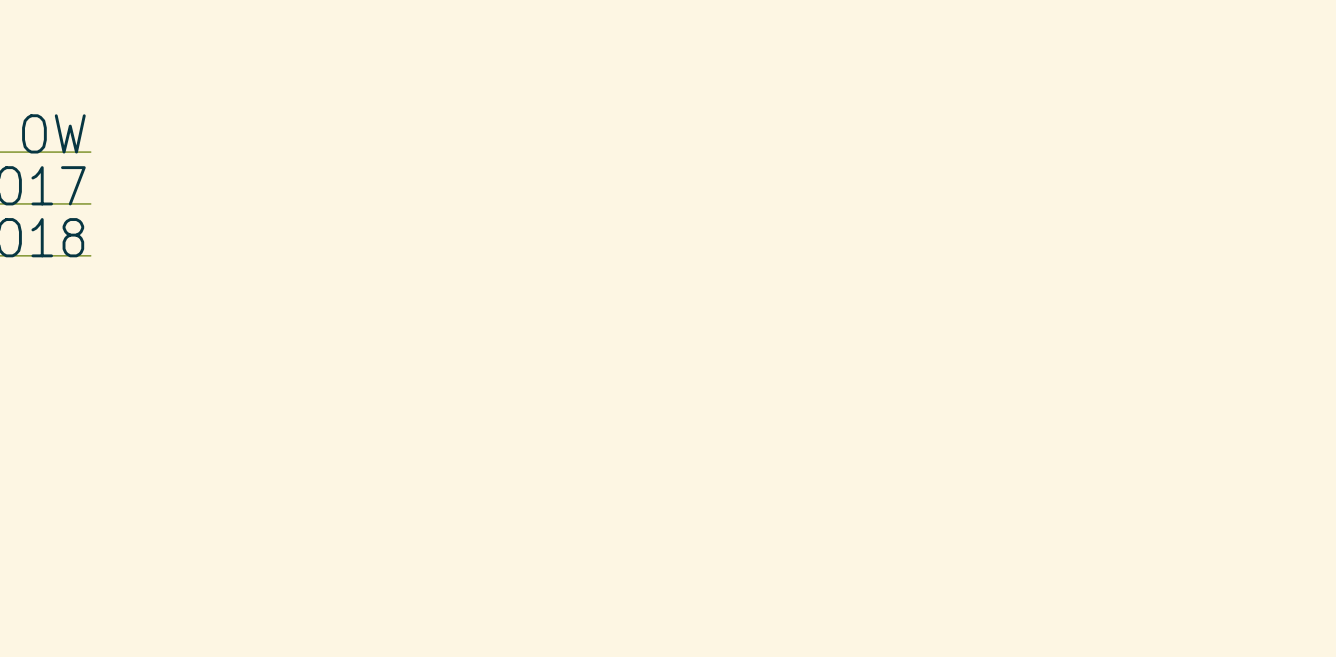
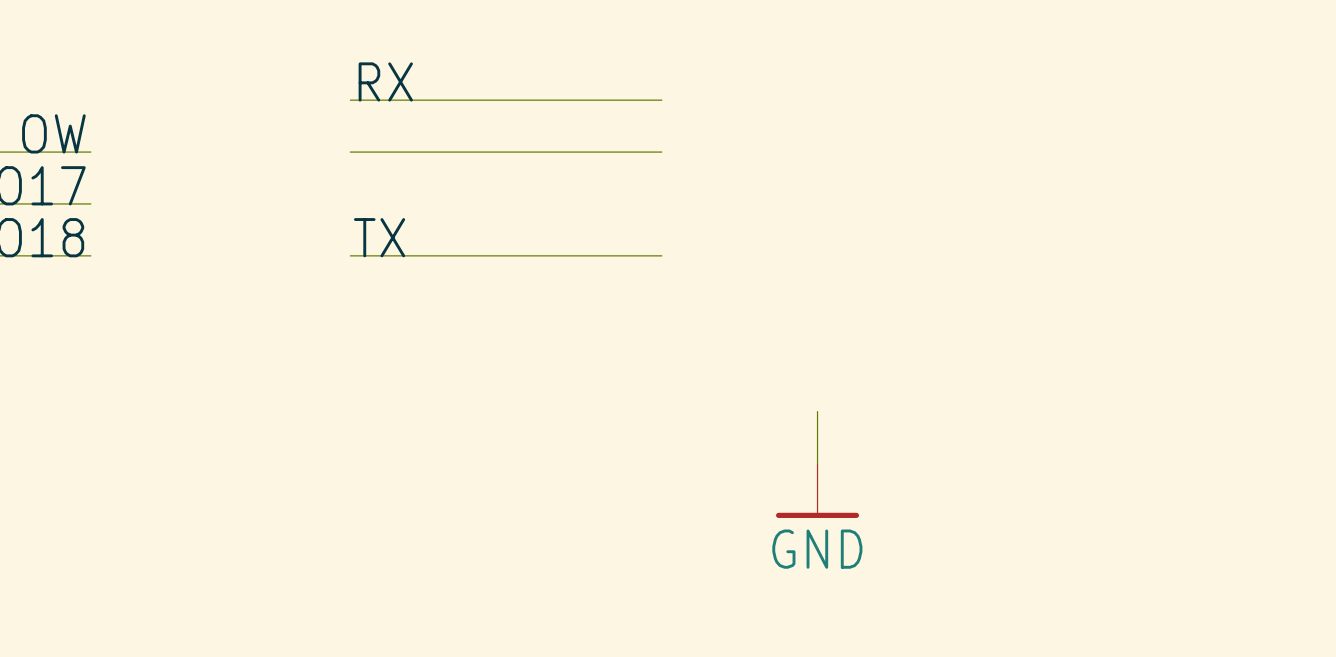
label: none -> RX (385, 81)
wire: none -> (350, 100) (661, 100)
wire: none -> (350, 152) (661, 152)
label: none -> TX (379, 237)
wire: none -> (350, 255) (661, 255)
wire: none -> (817, 411) (817, 463)
power symbol: none -> GND (817, 490)

